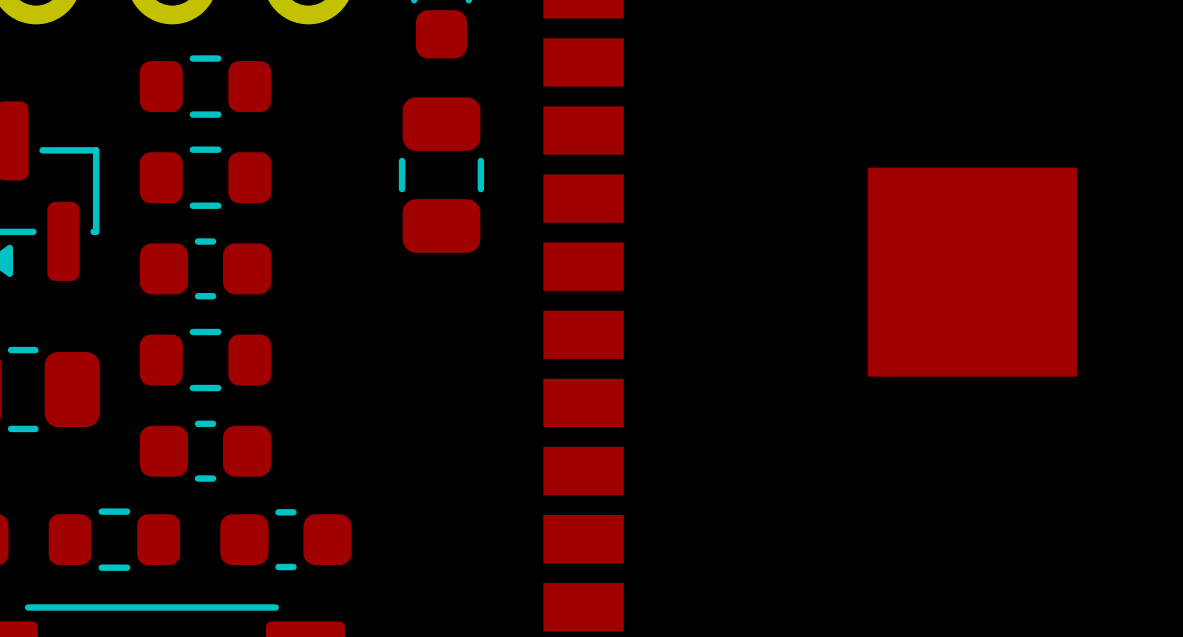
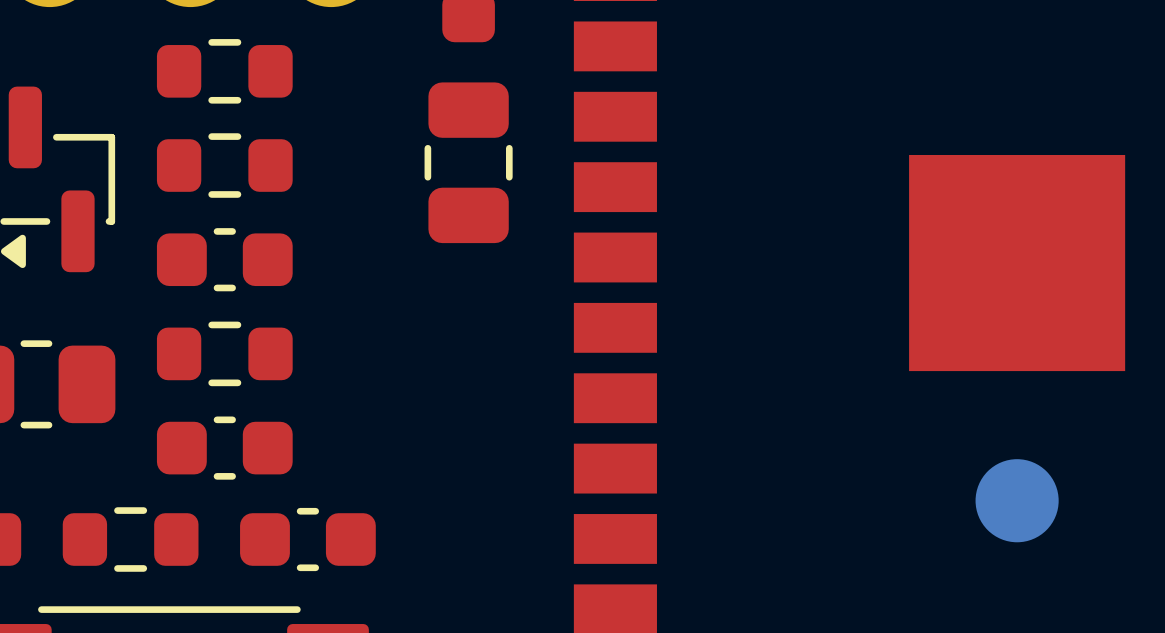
part: none -> (1017, 500)

